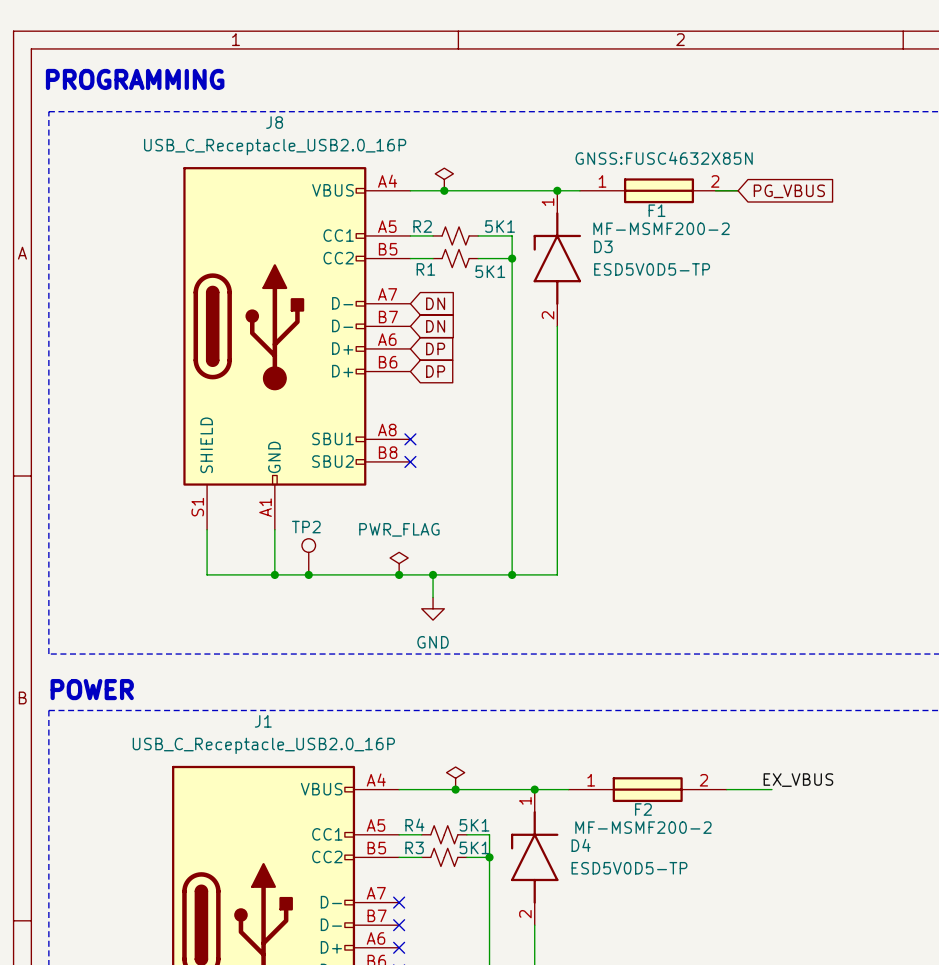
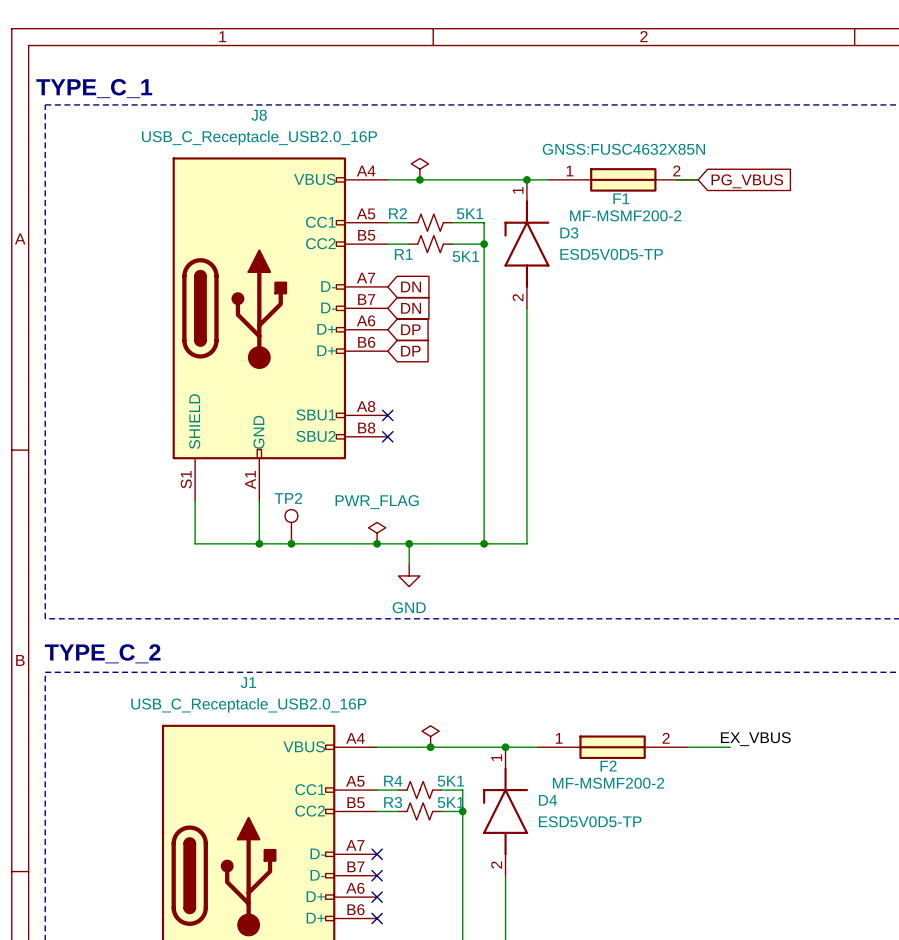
text: PROGRAMMING (135, 79) -> none
text: none -> TYPE_C_1 (94, 88)
text: POWER (92, 689) -> none
text: none -> TYPE_C_2 (102, 653)

